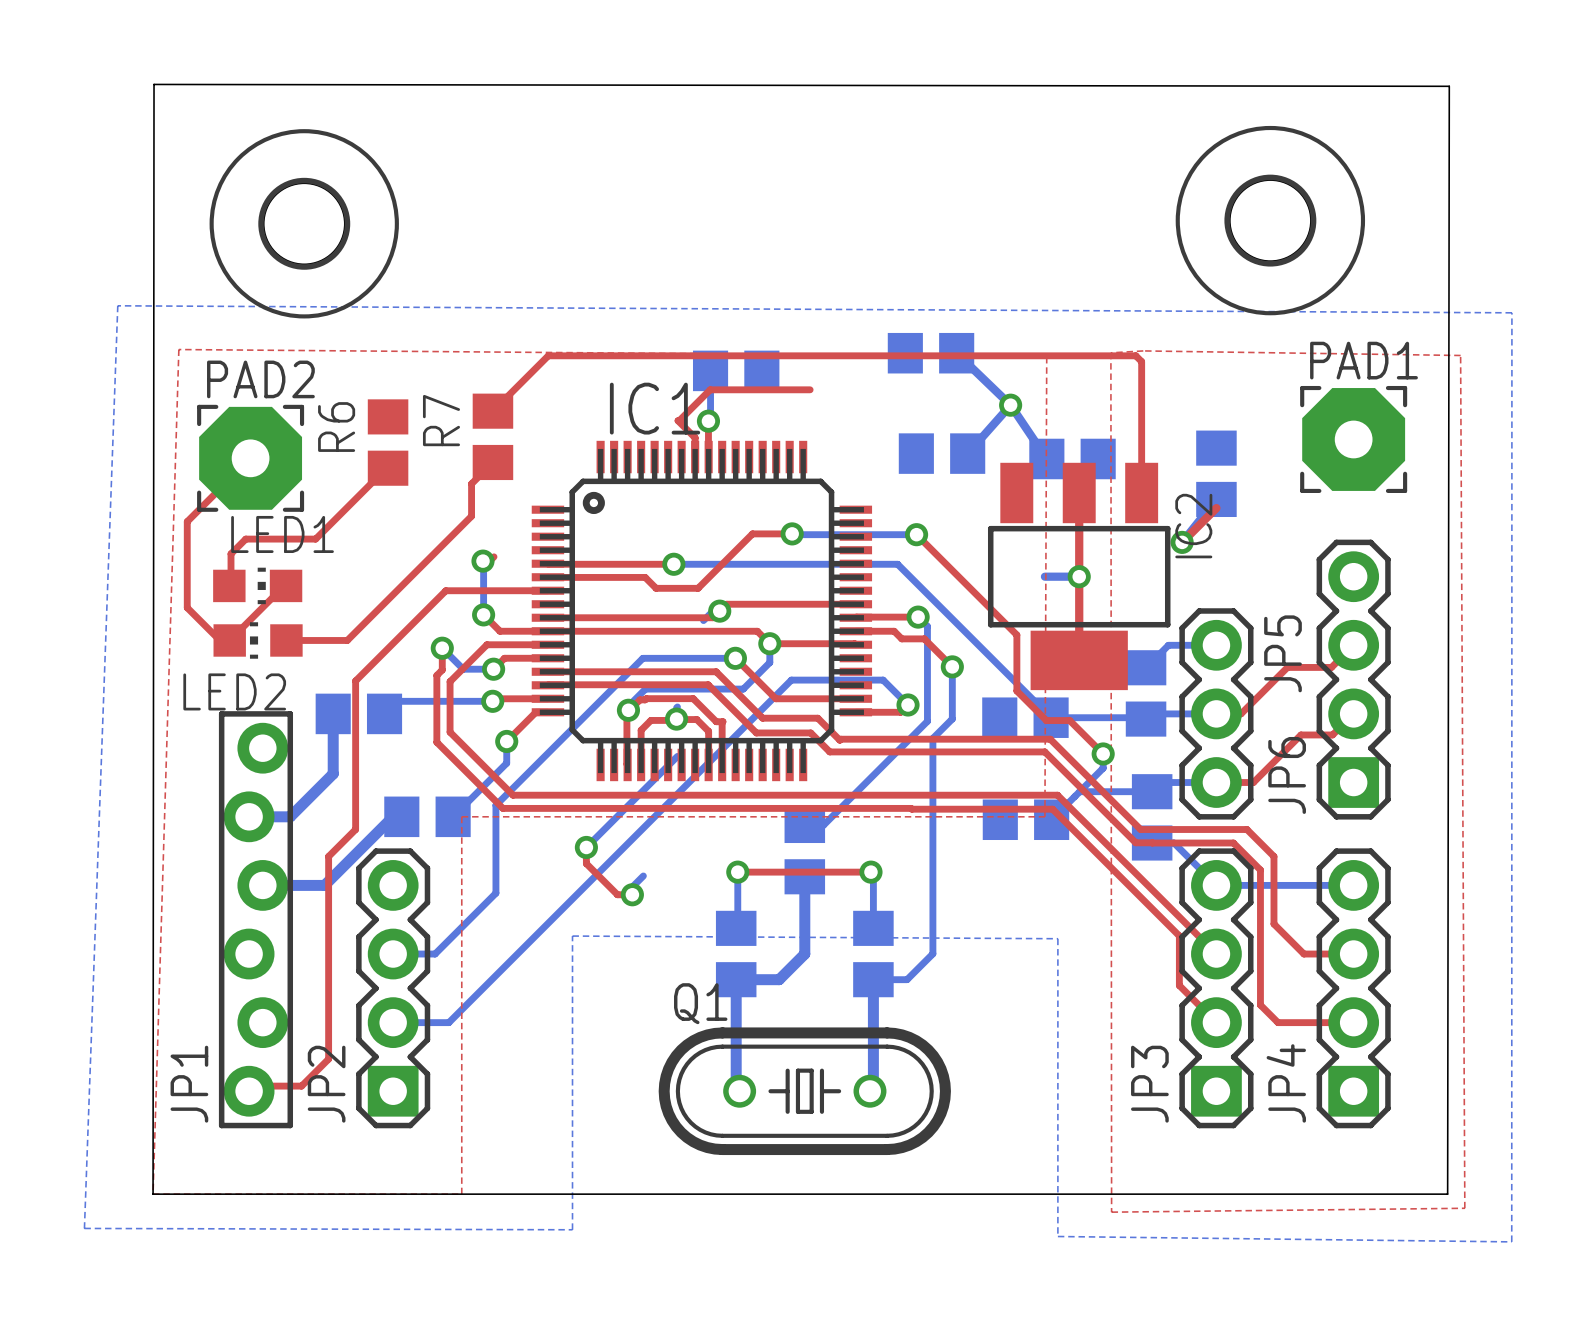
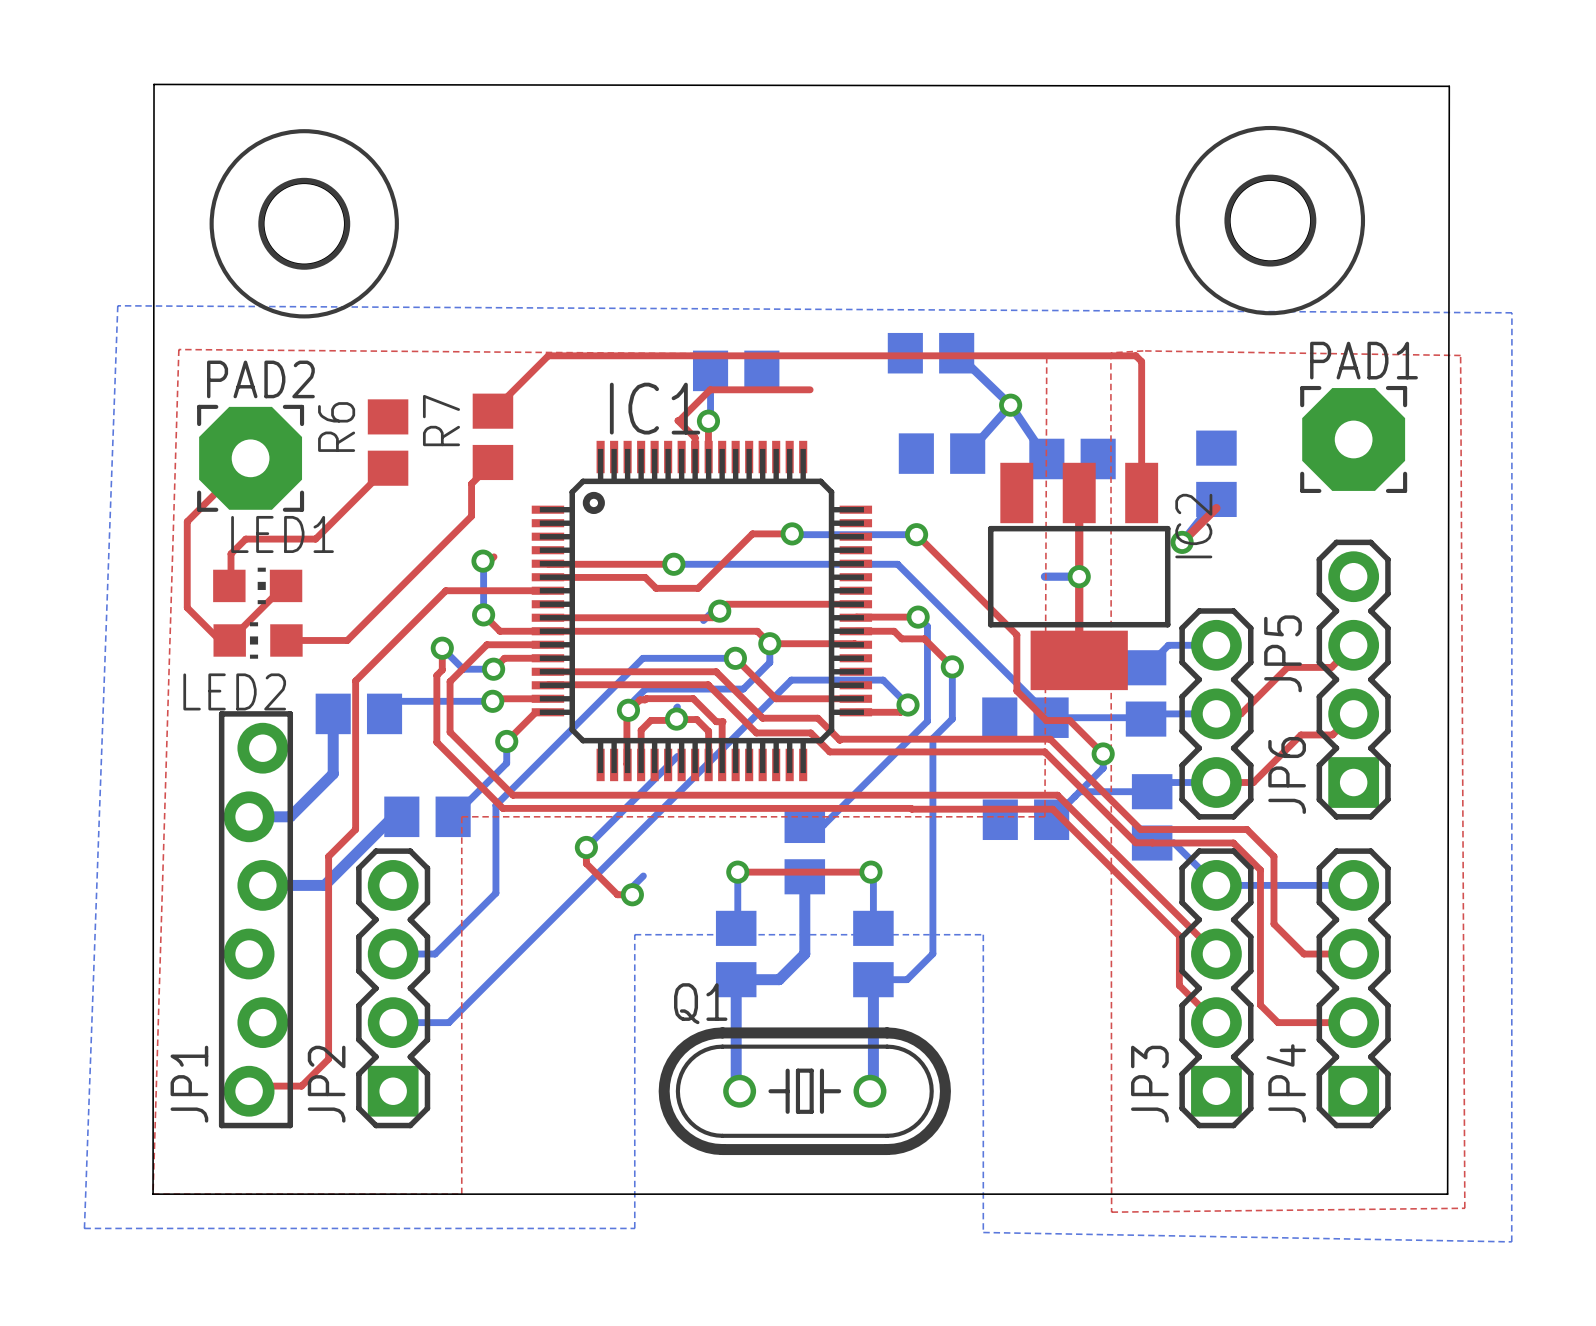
bottom zone outline: (84, 1228) (572, 1229) (572, 936) (1057, 938) (1057, 1236) (1511, 1241) -> (84, 1228) (634, 1228) (634, 934) (983, 934) (983, 1232) (1511, 1241)

